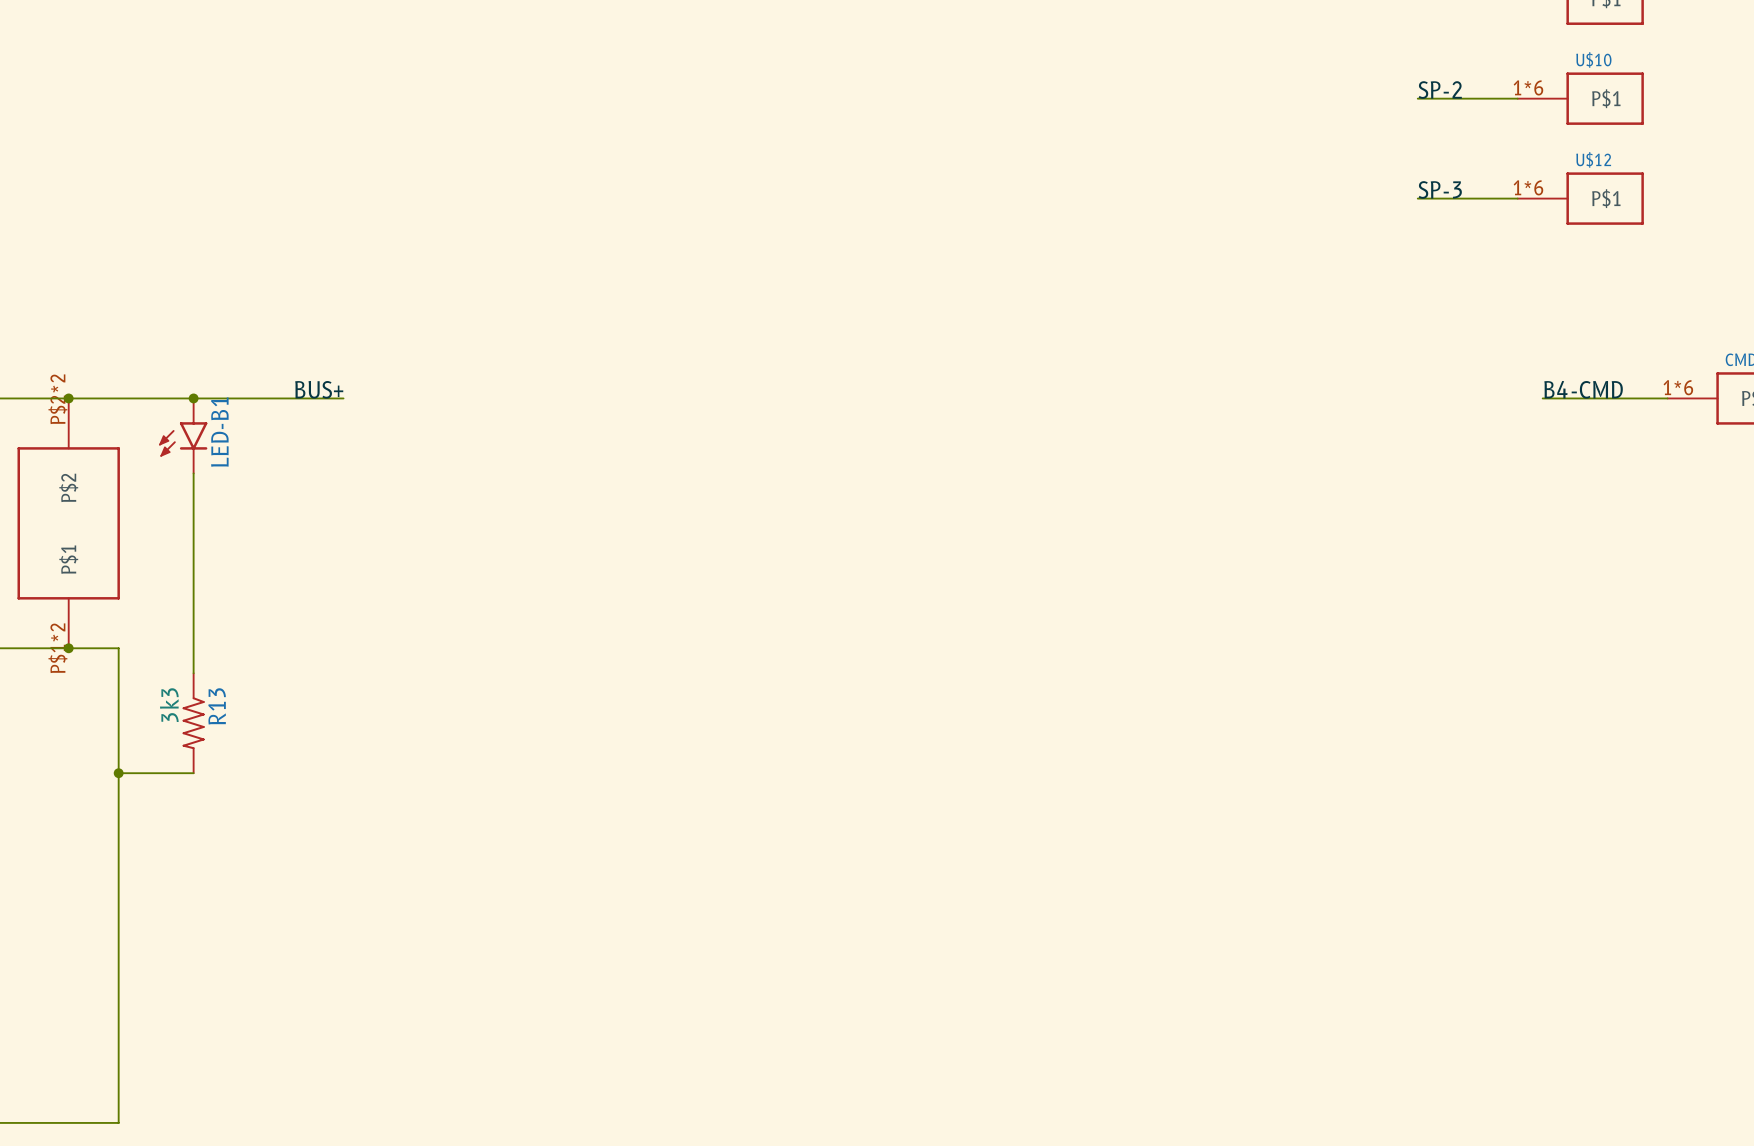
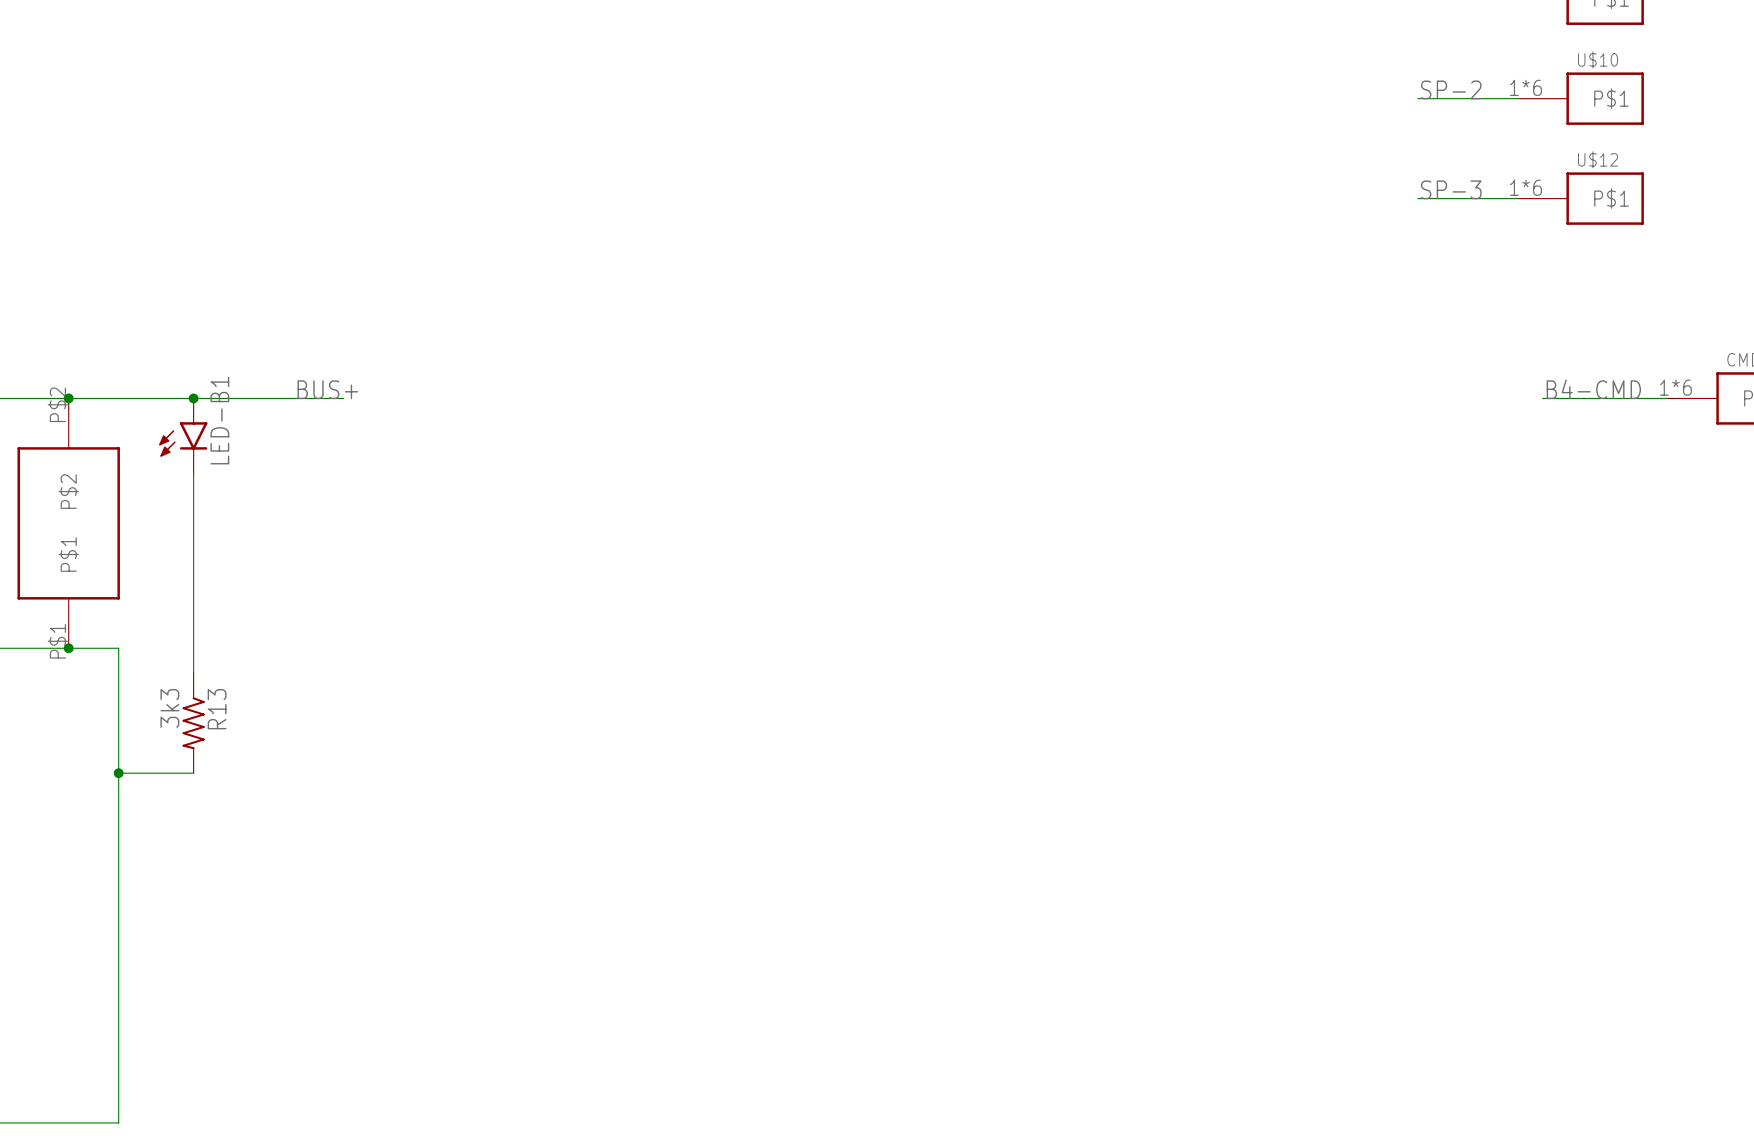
part pin number: P$2*2 (57, 399) -> P$2 (57, 404)
part pin number: P$1*2 (57, 648) -> P$1 (57, 641)

